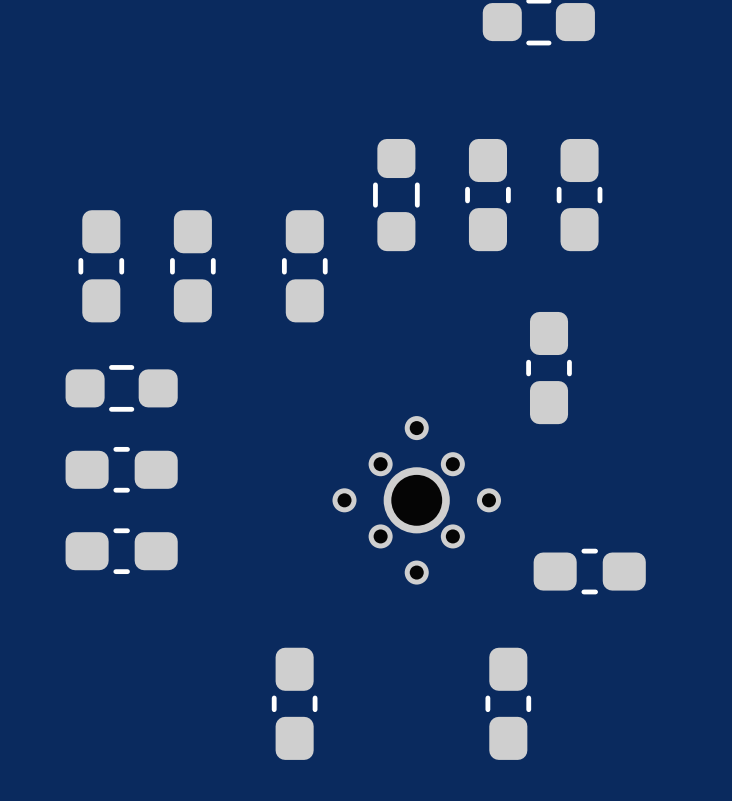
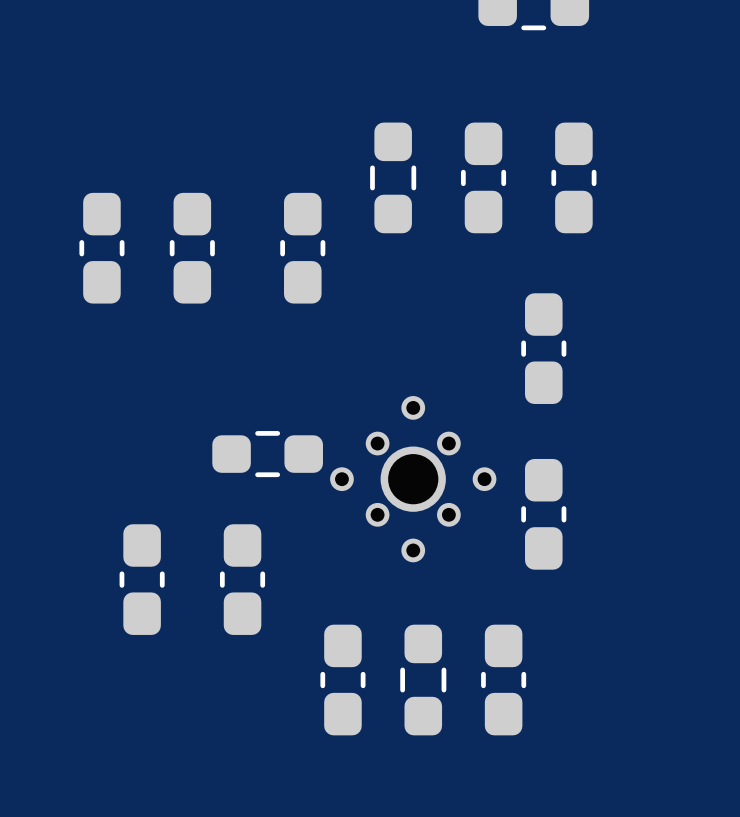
part position: (121, 388) -> (267, 454)
part: (121, 469) -> none
part rotation: 0° (121, 551) -> 90° clockwise (142, 579)
part rotation: 0° (589, 571) -> 90° clockwise (543, 514)
part: none -> (242, 579)
part position: (294, 703) -> (342, 680)
part: none -> (423, 680)

